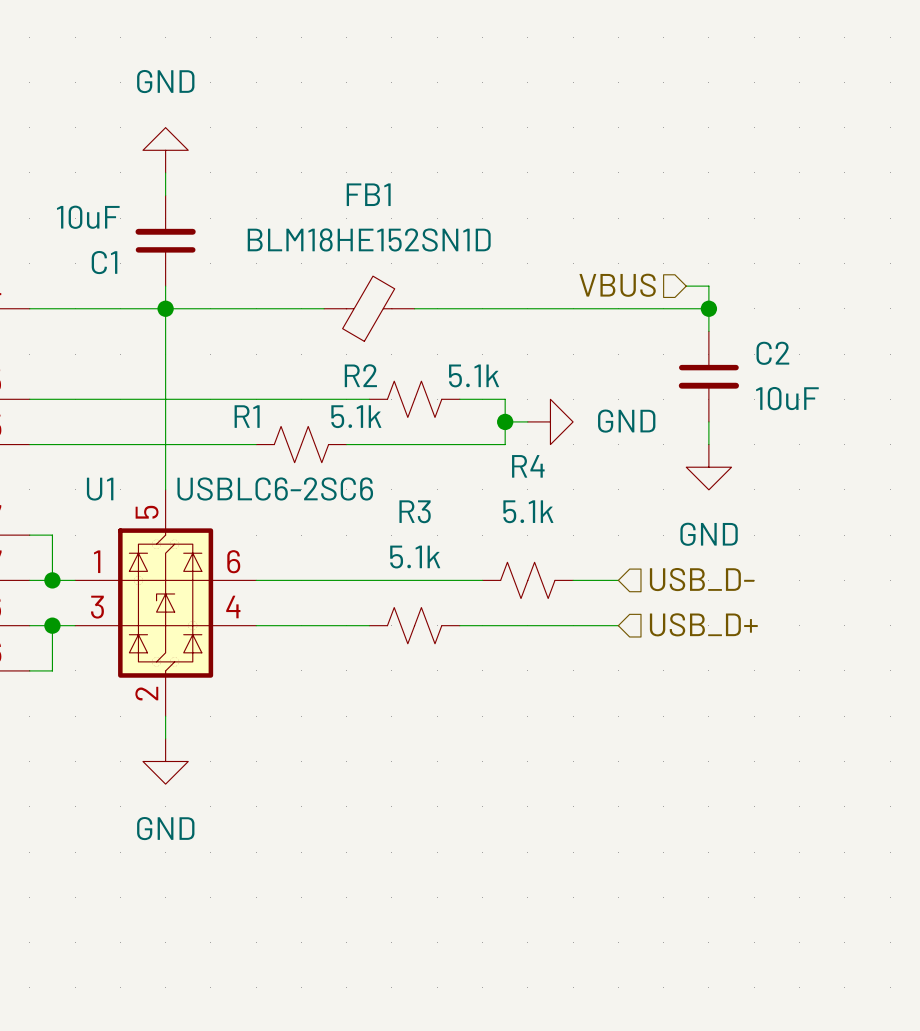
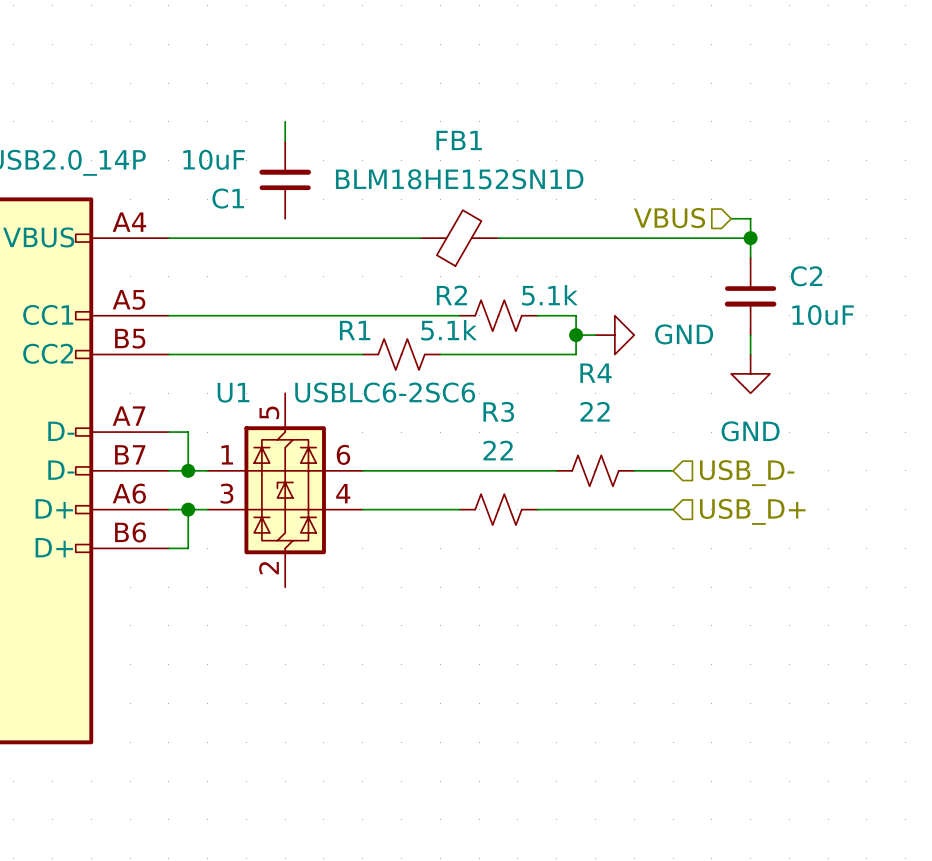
power symbol: GND (165, 150) -> none
wire: (165, 286) (165, 489) -> none
junction: (165, 308) -> none
R4 value: 5.1k (528, 511) -> 22 (595, 411)
R3 value: 5.1k (415, 557) -> 22 (498, 450)
wire: (165, 716) (165, 738) -> none
power symbol: GND (165, 761) -> none

